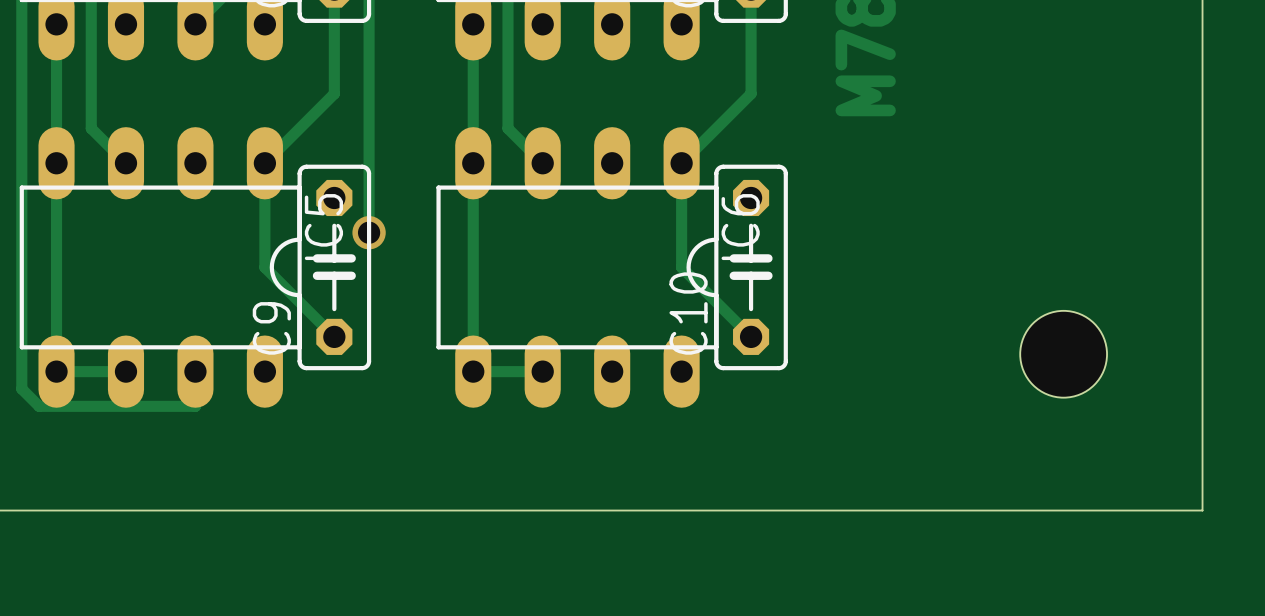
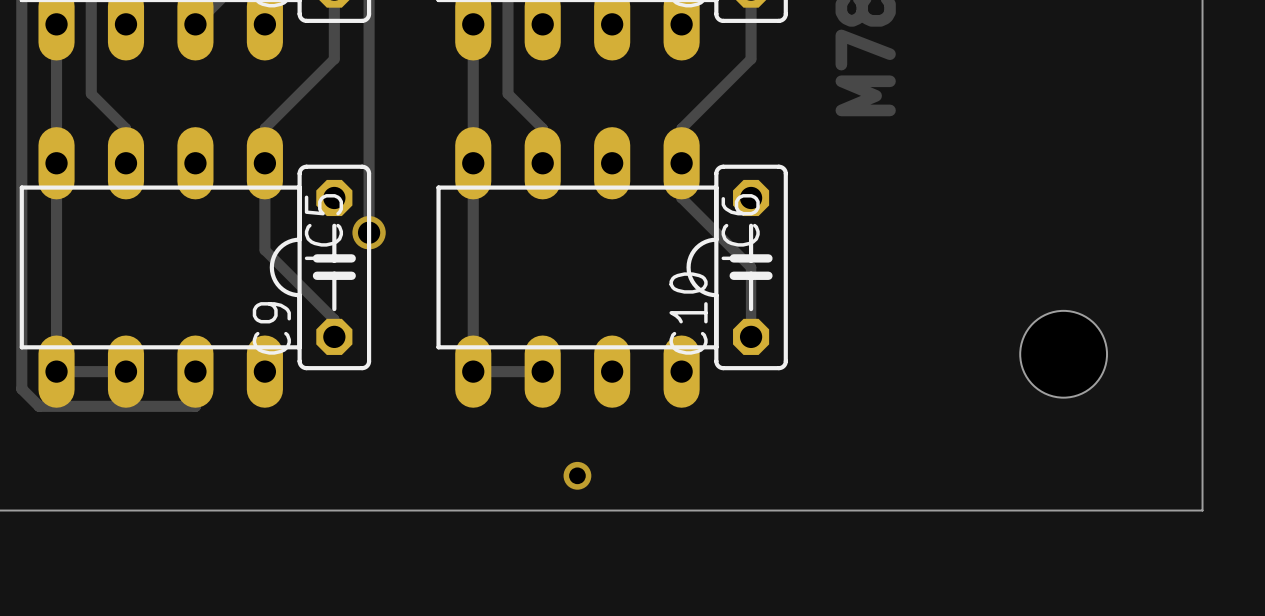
track: (334, 59) (334, 93) (264, 163) -> (334, 59) (264, 128) (264, 163)
track: (751, 59) (751, 93) (681, 163) -> (751, 59) (681, 128) (681, 163)
track: (91, 93) (91, 128) (125, 163) -> (91, 93) (125, 128) (125, 163)
track: (507, 93) (507, 128) (542, 163) -> (507, 93) (542, 128) (542, 163)
track: (681, 197) (681, 267) (751, 336) -> (681, 197) (751, 267) (751, 336)
track: (264, 250) (264, 267) (334, 336) -> (264, 250) (334, 319) (334, 336)
via: none -> (577, 475)

